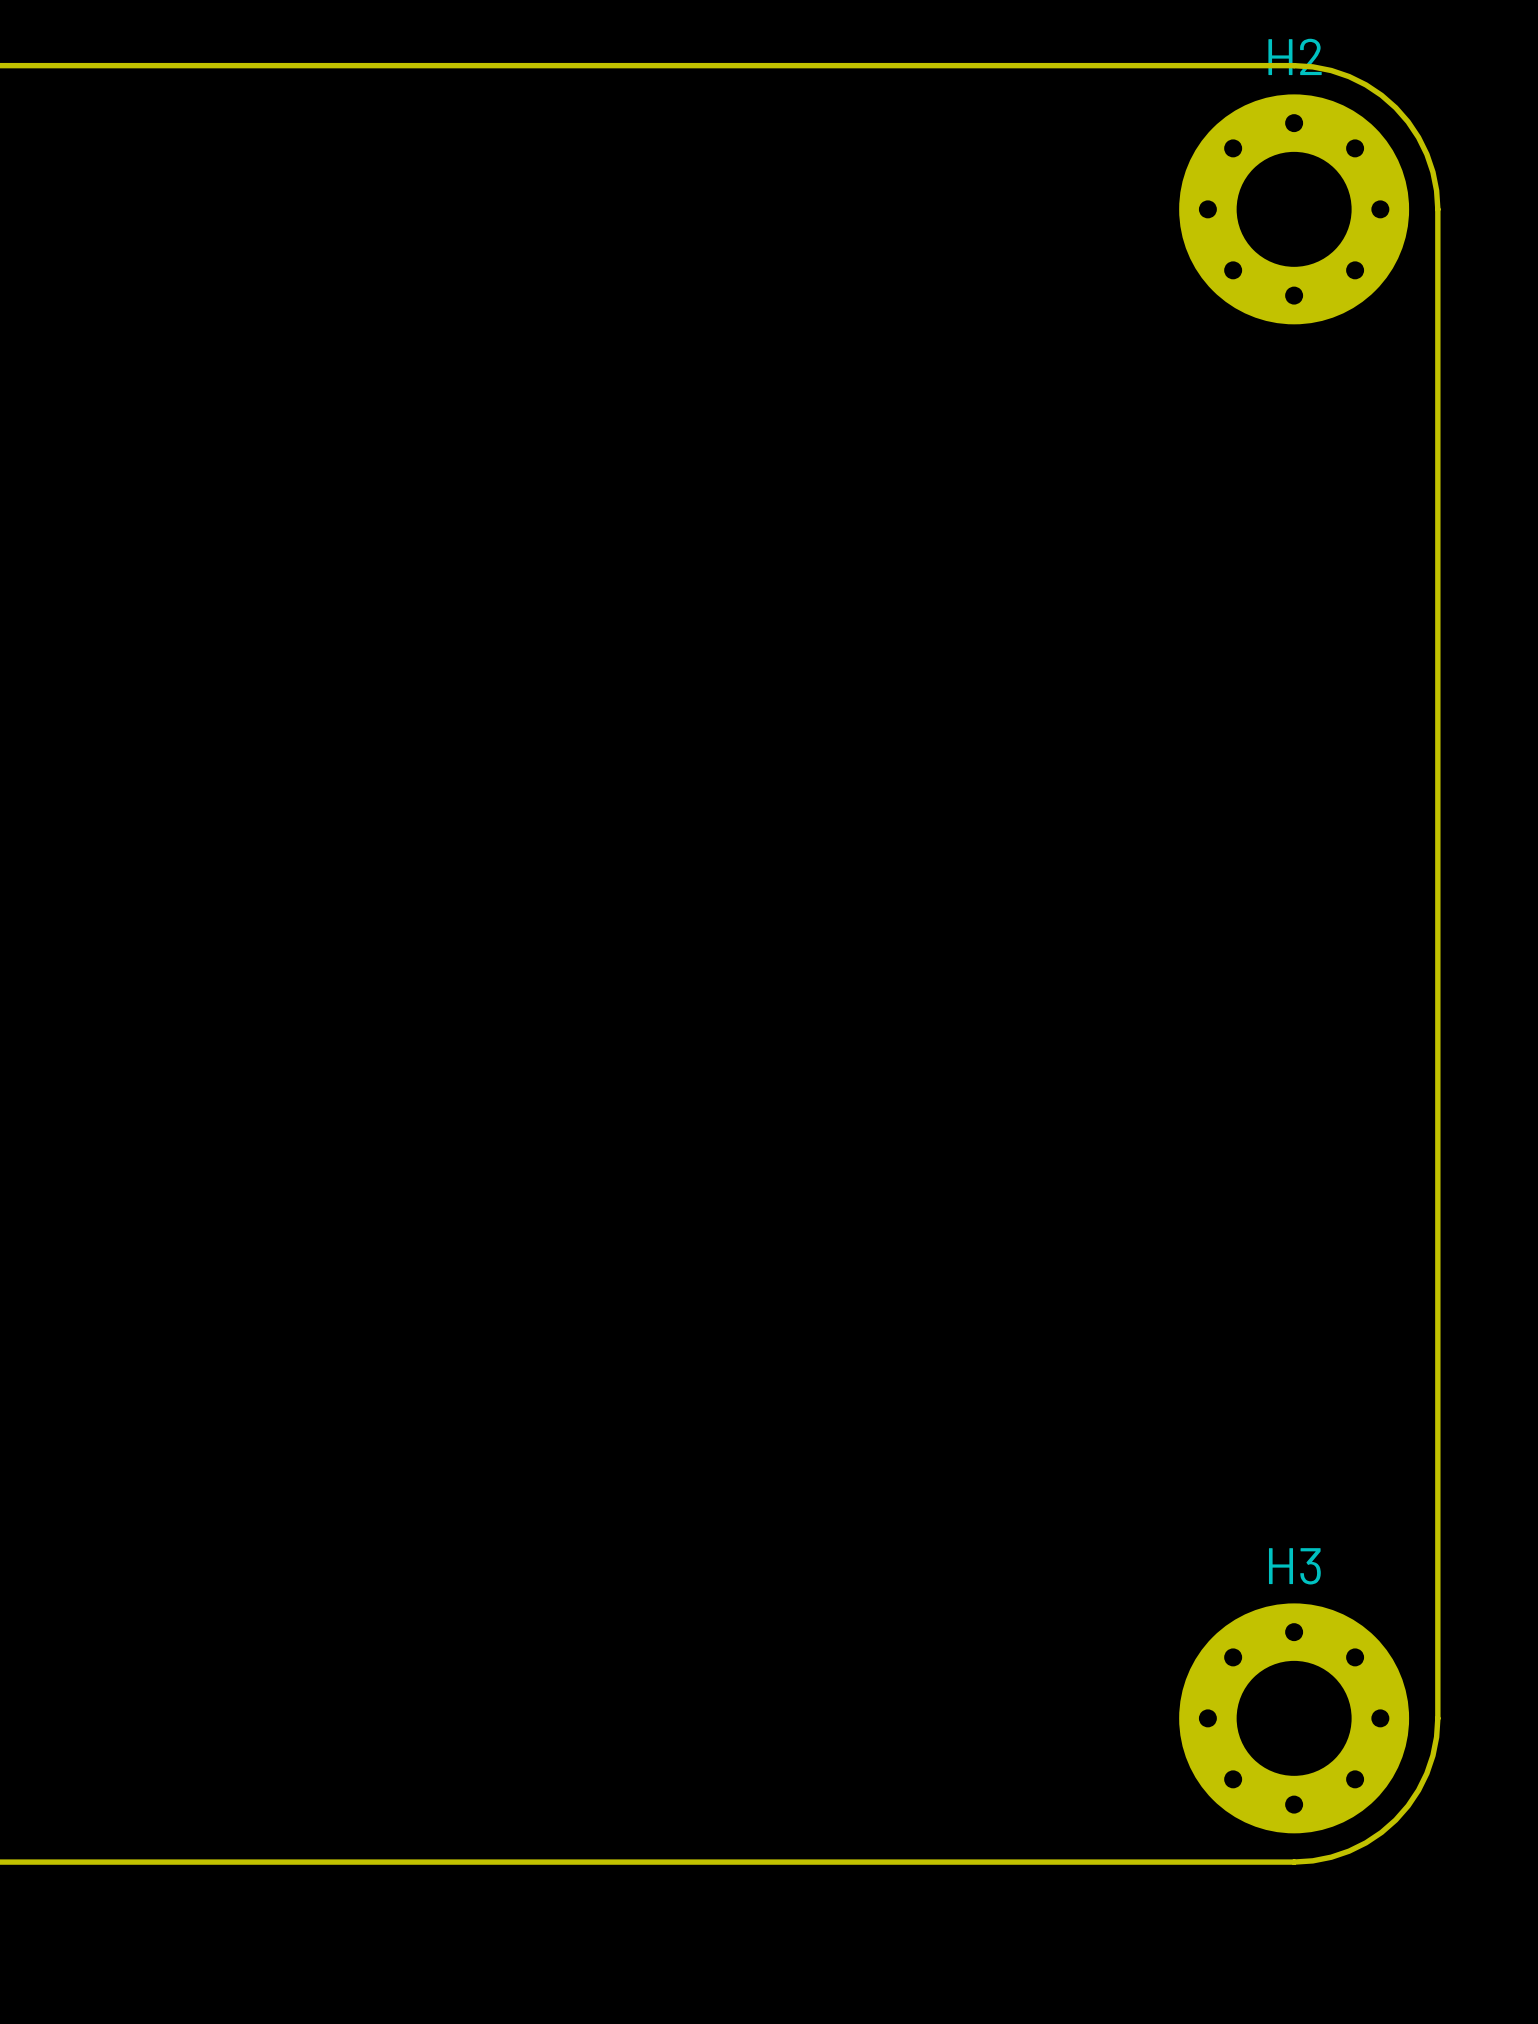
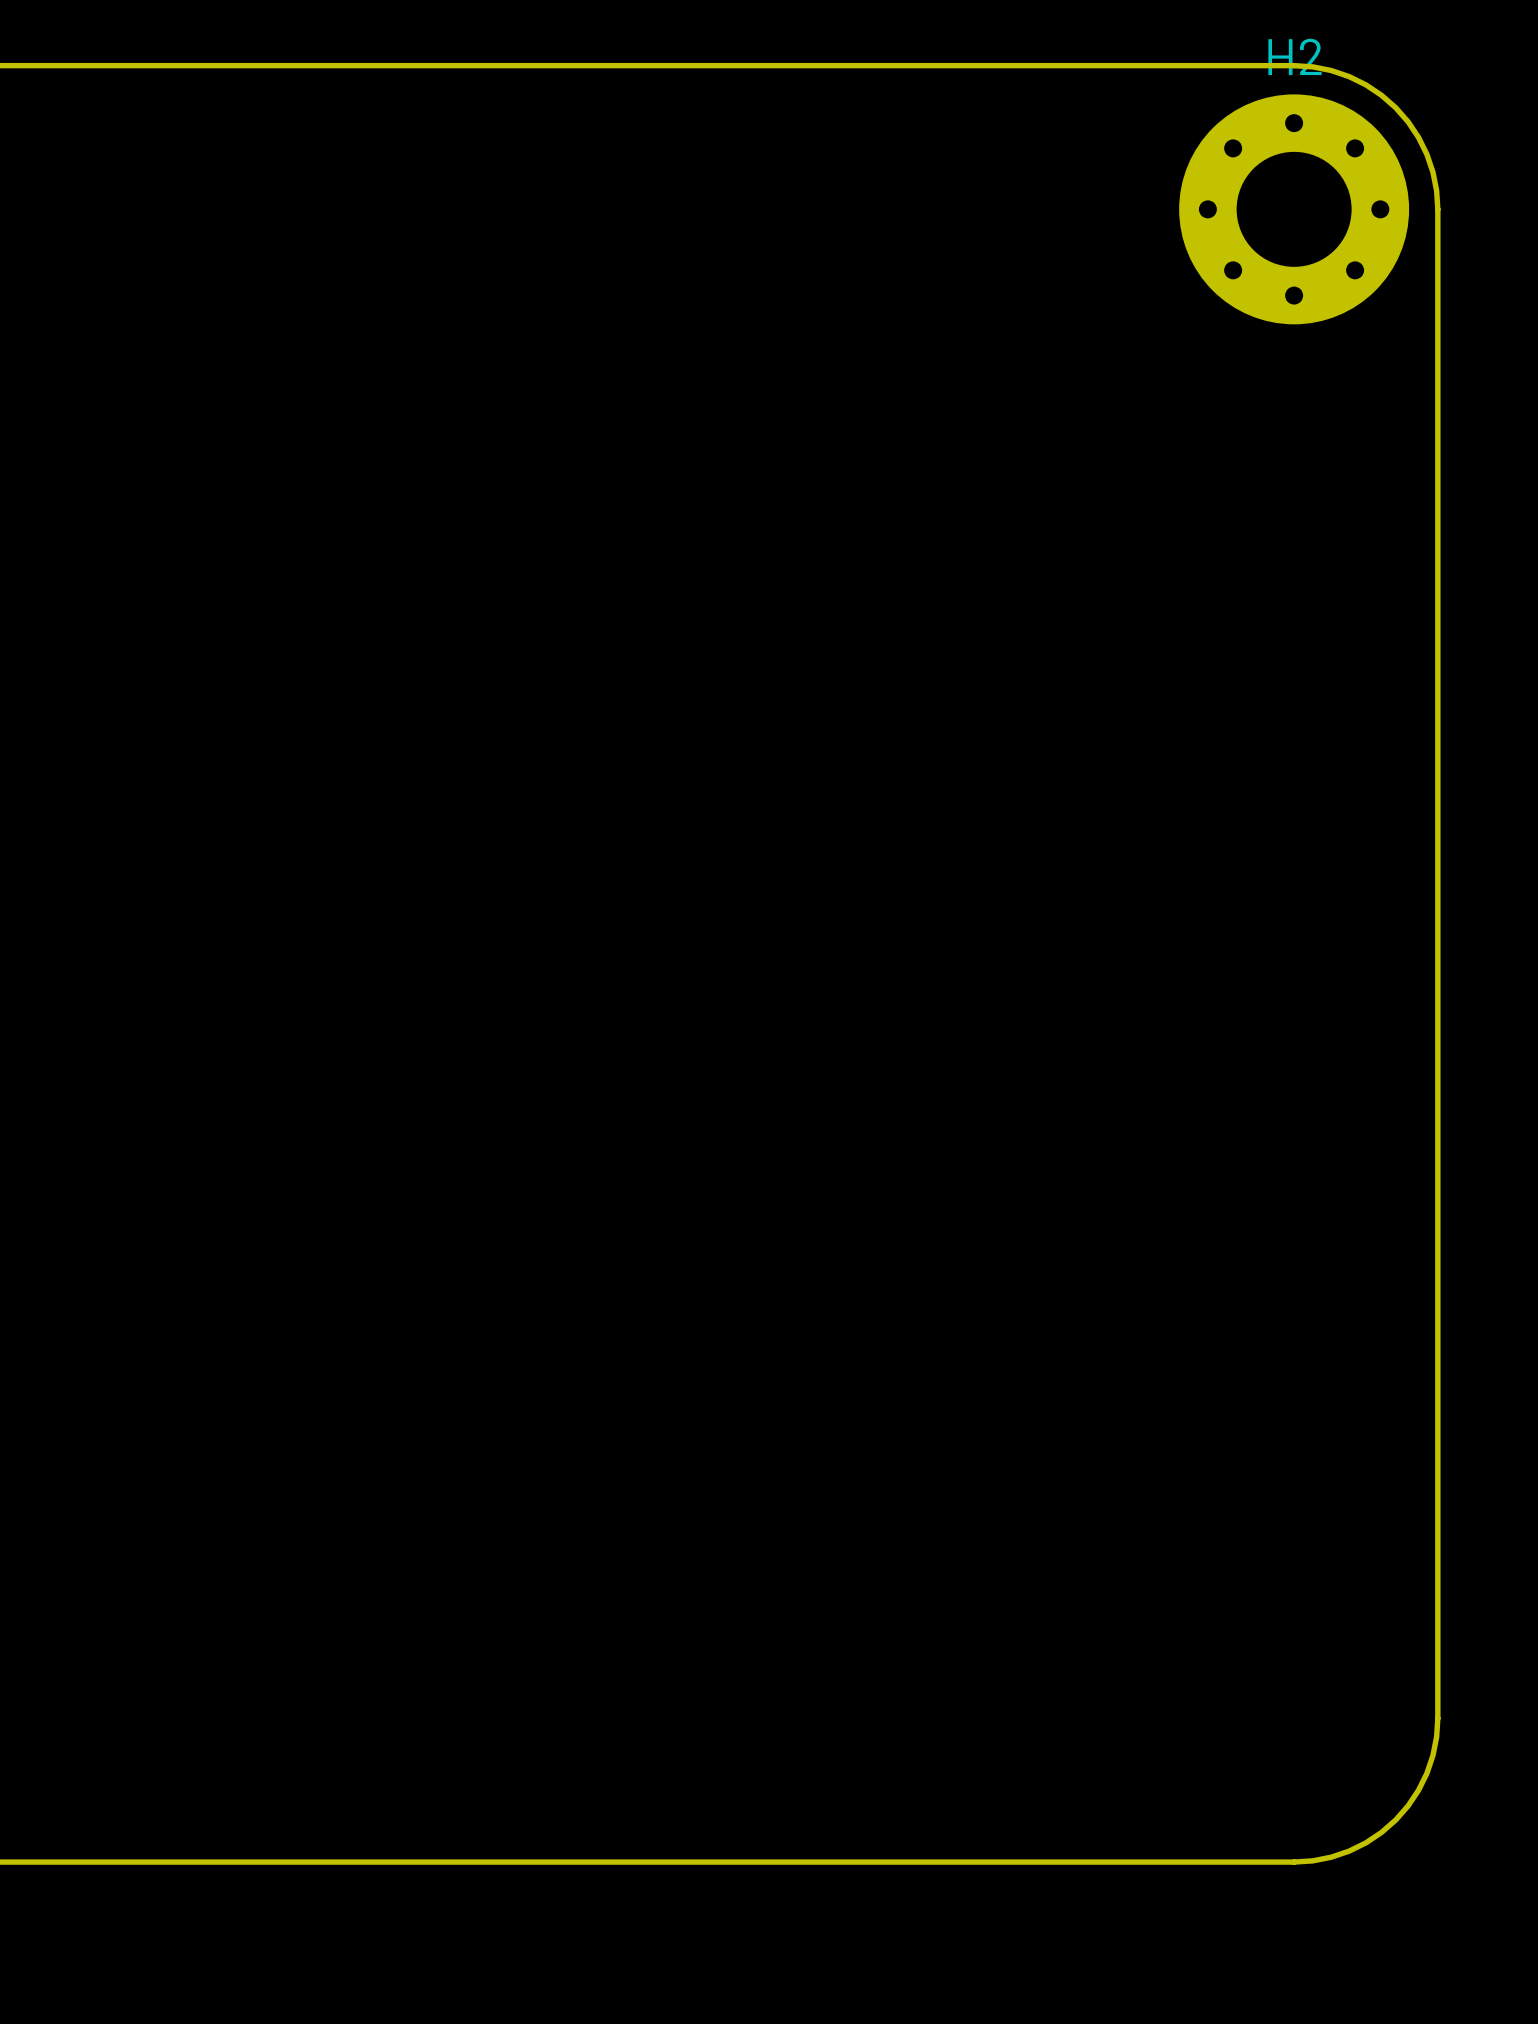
H3: (1294, 1718) -> none

